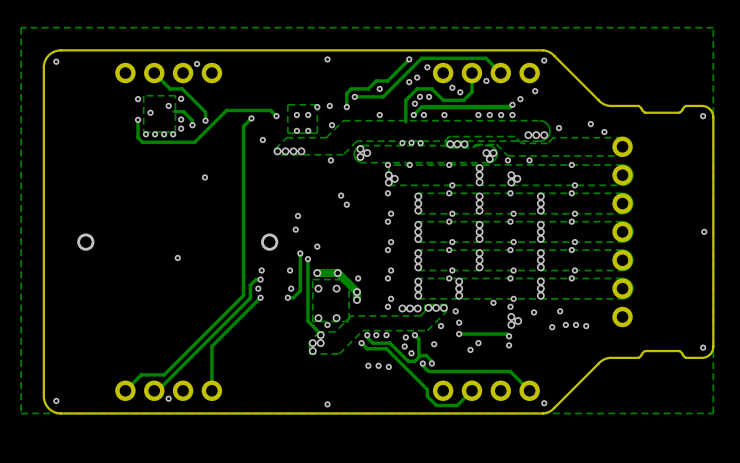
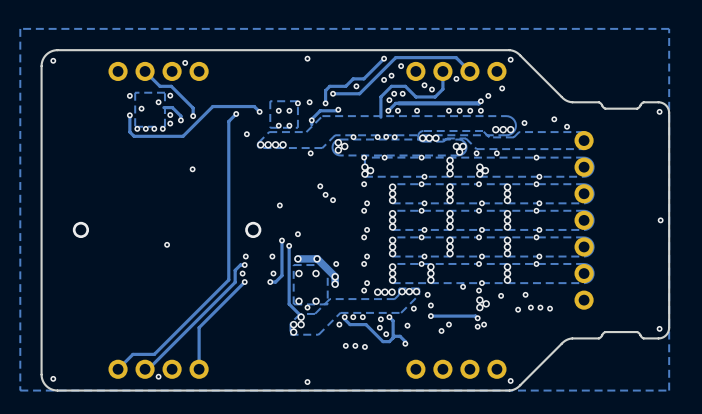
track: none -> (338, 109) (320, 110) (311, 119) (311, 124)
via: none -> (338, 109)
via: (379, 115) -> none
via: none -> (353, 137)
via: none -> (333, 200)
via: (295, 229) -> none
track: (361, 343) (367, 348) (386, 348) (427, 389) (427, 396) (436, 405) (457, 405) (471, 390) -> none
via: none -> (484, 324)
track: (422, 363) (428, 371) (510, 371) (529, 390) -> none
via: (422, 363) -> none

